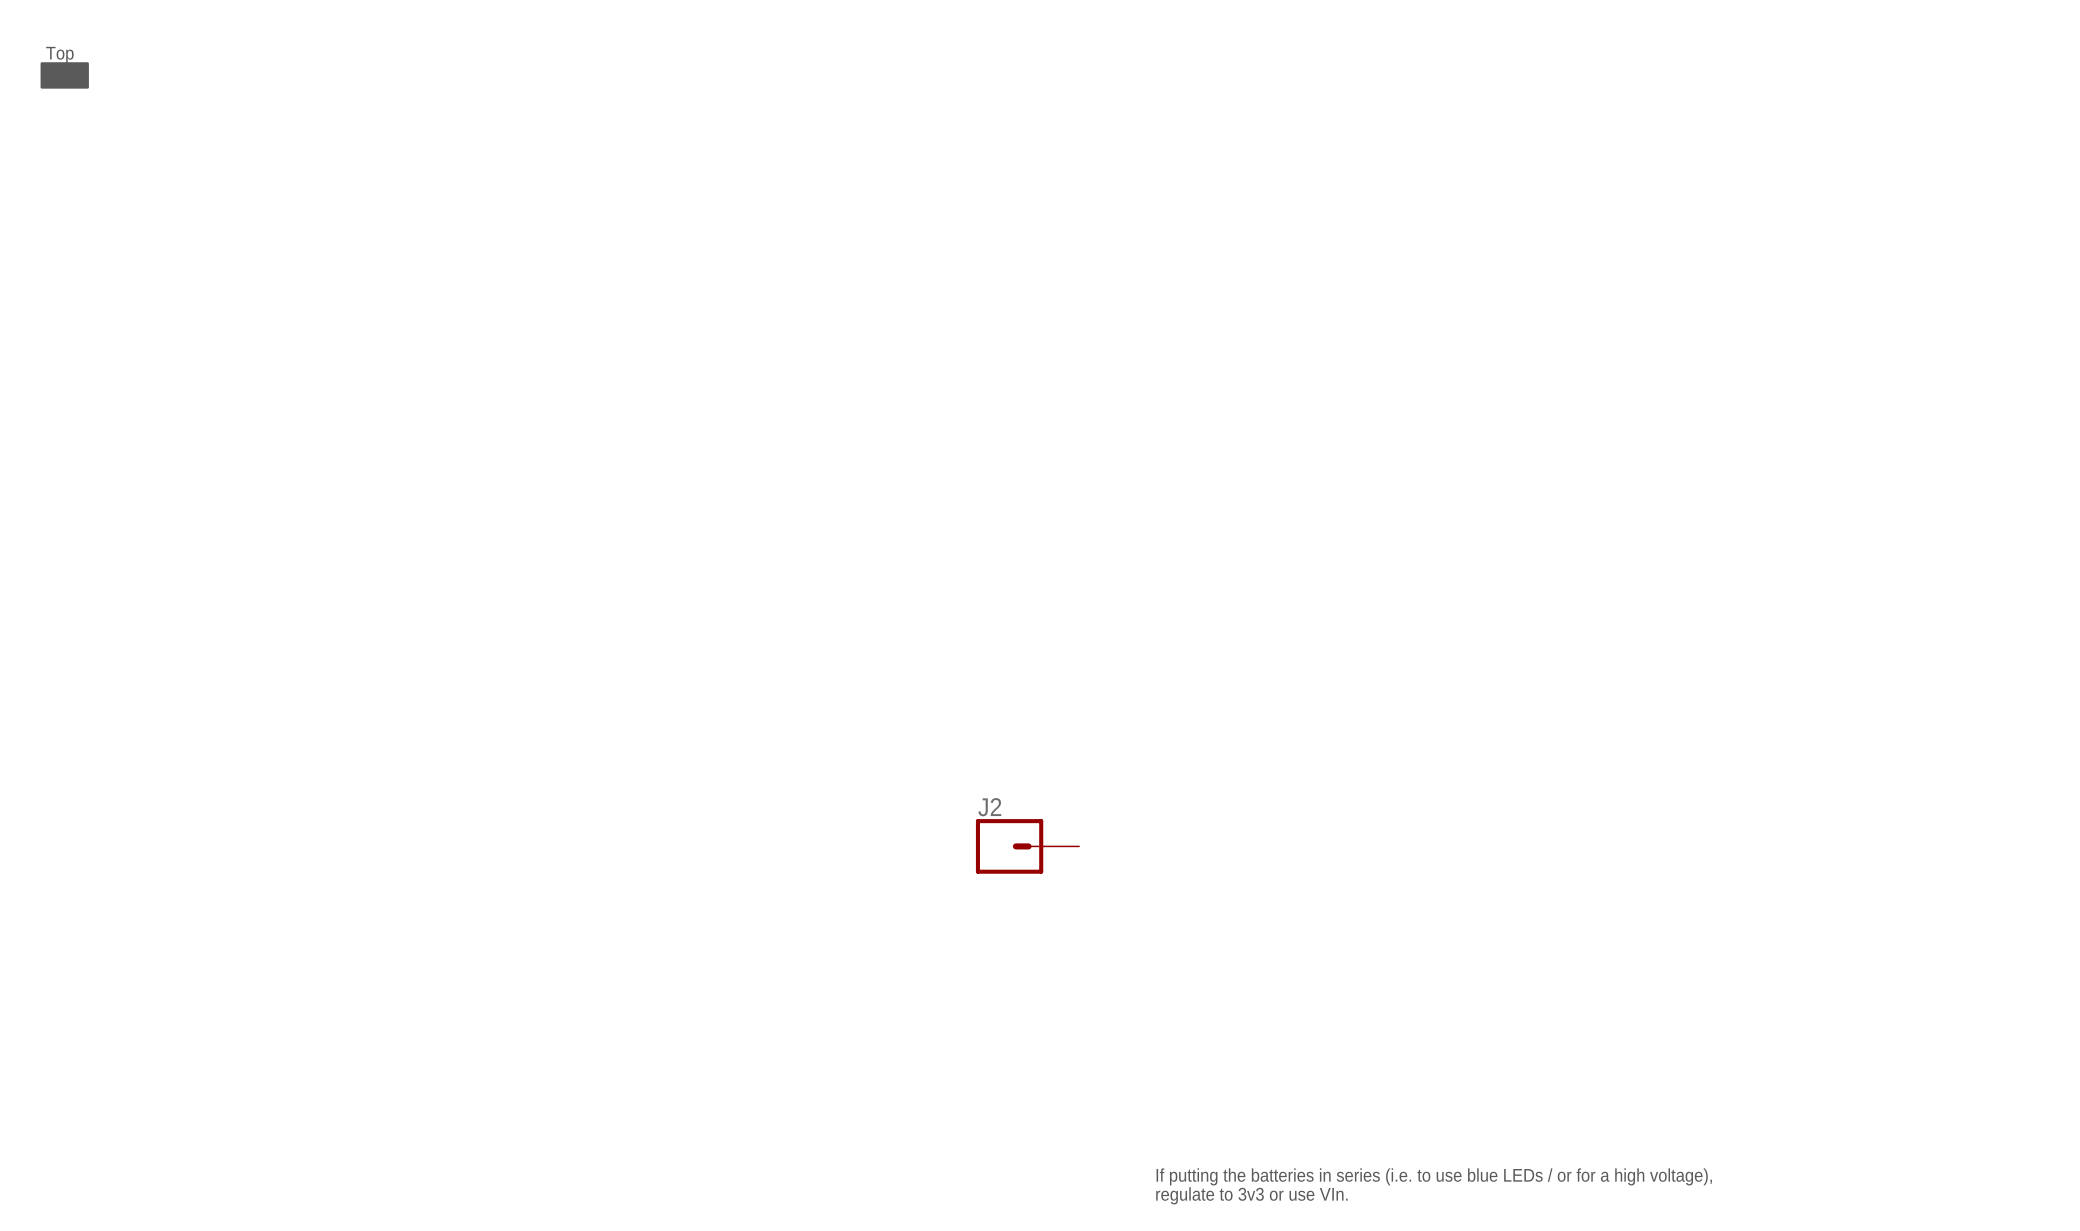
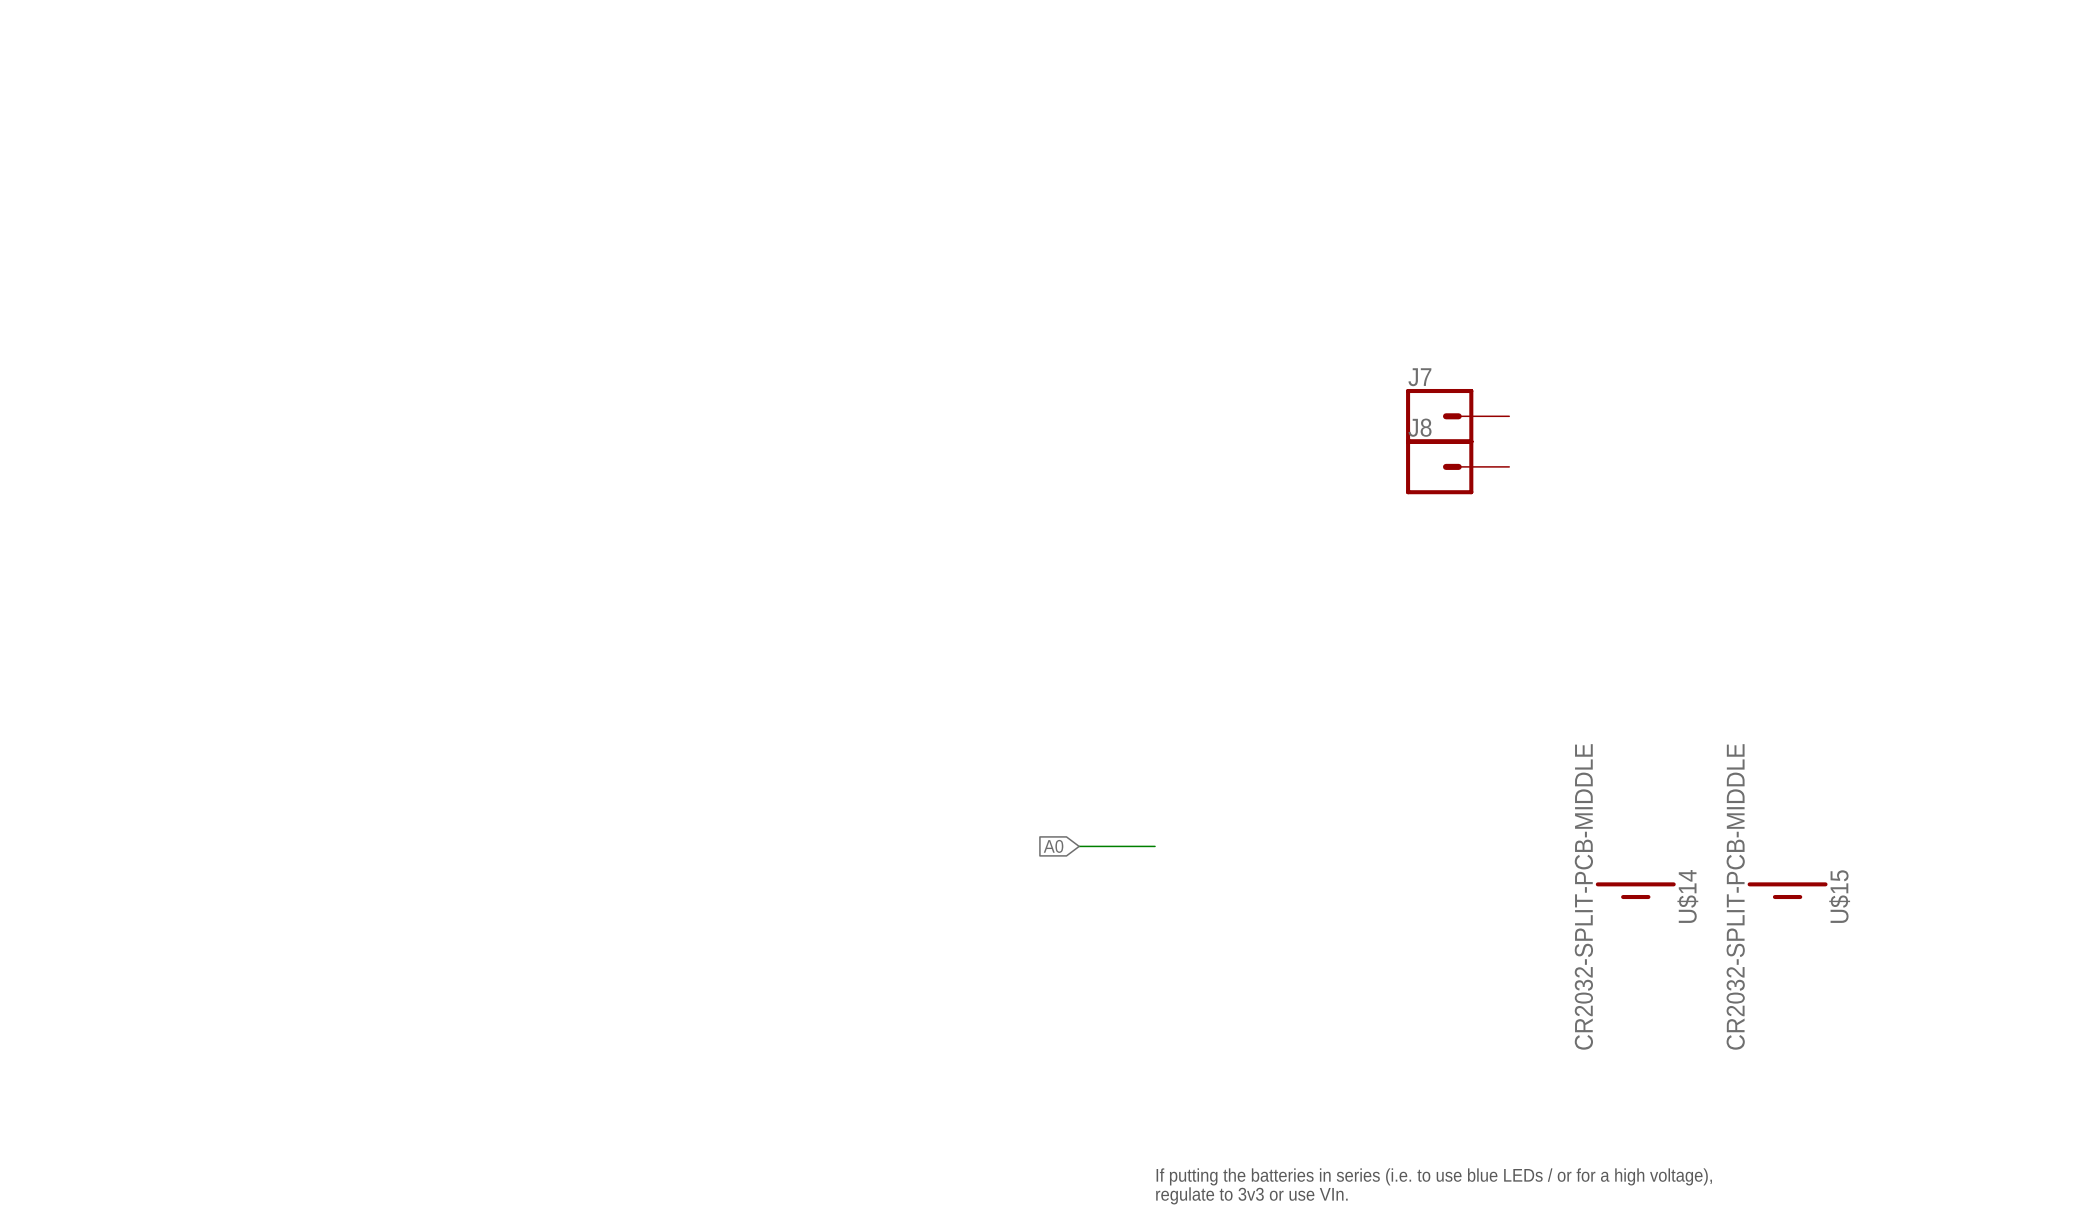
part: (64, 75) -> none
J7: none -> (1457, 416)
J8: none -> (1457, 466)
J2: (1027, 846) -> none
global label: none -> A0 (1053, 846)
wire: none -> (1079, 846) (1155, 846)
U$14: none -> CR2032-SPLIT-PCB-MIDDLE (1635, 890)
U$15: none -> CR2032-SPLIT-PCB-MIDDLE (1787, 890)

